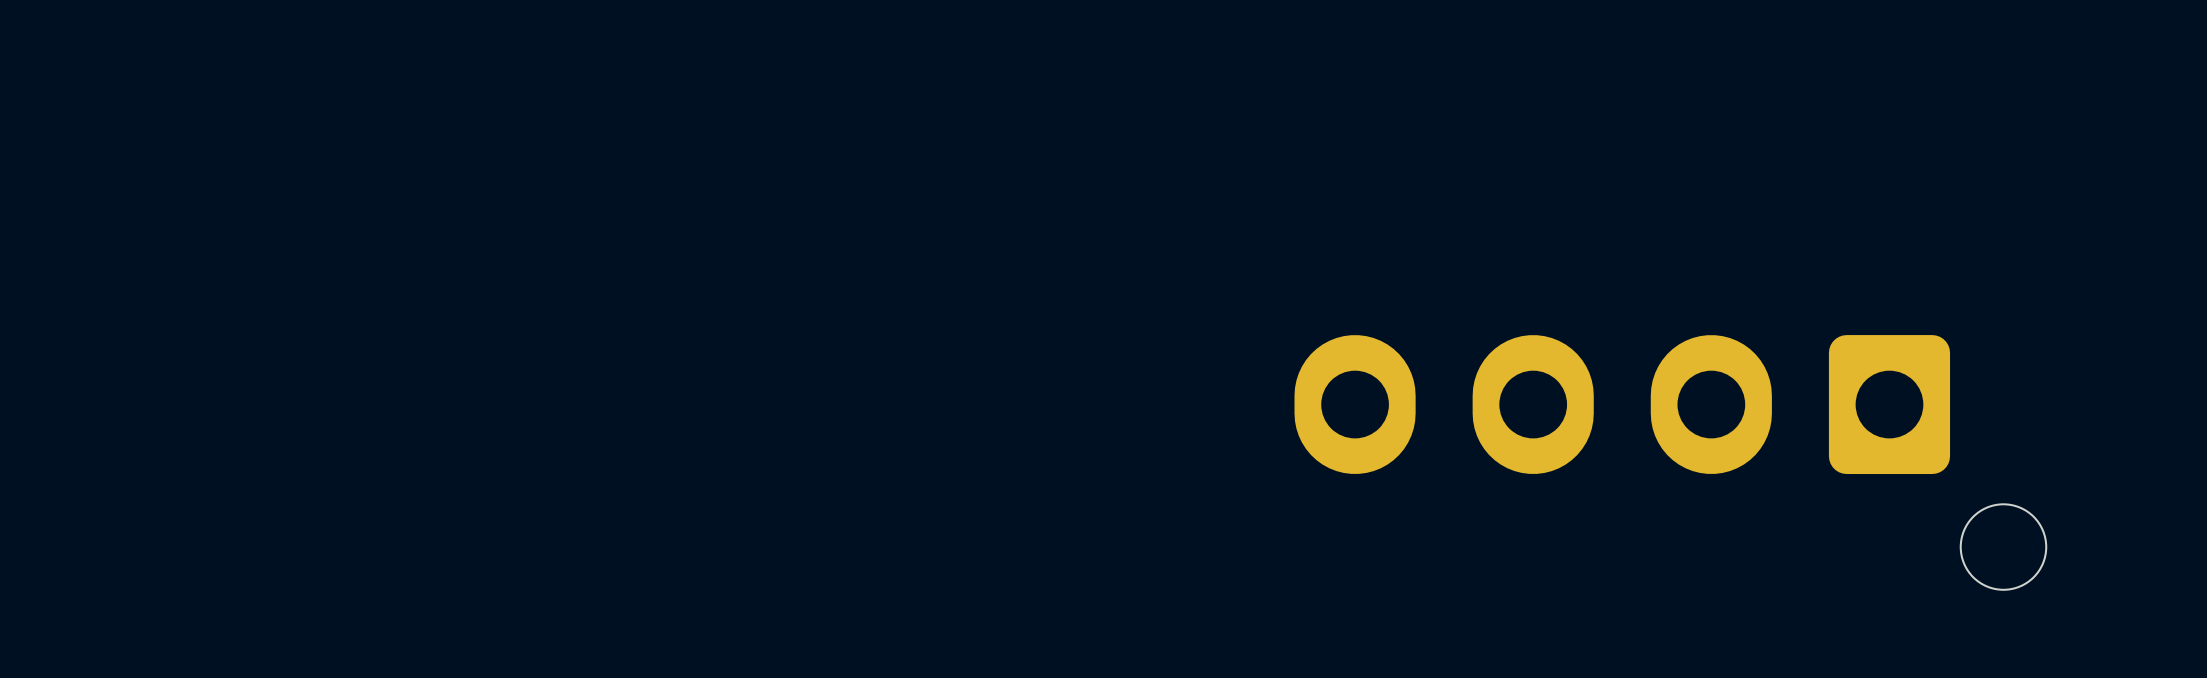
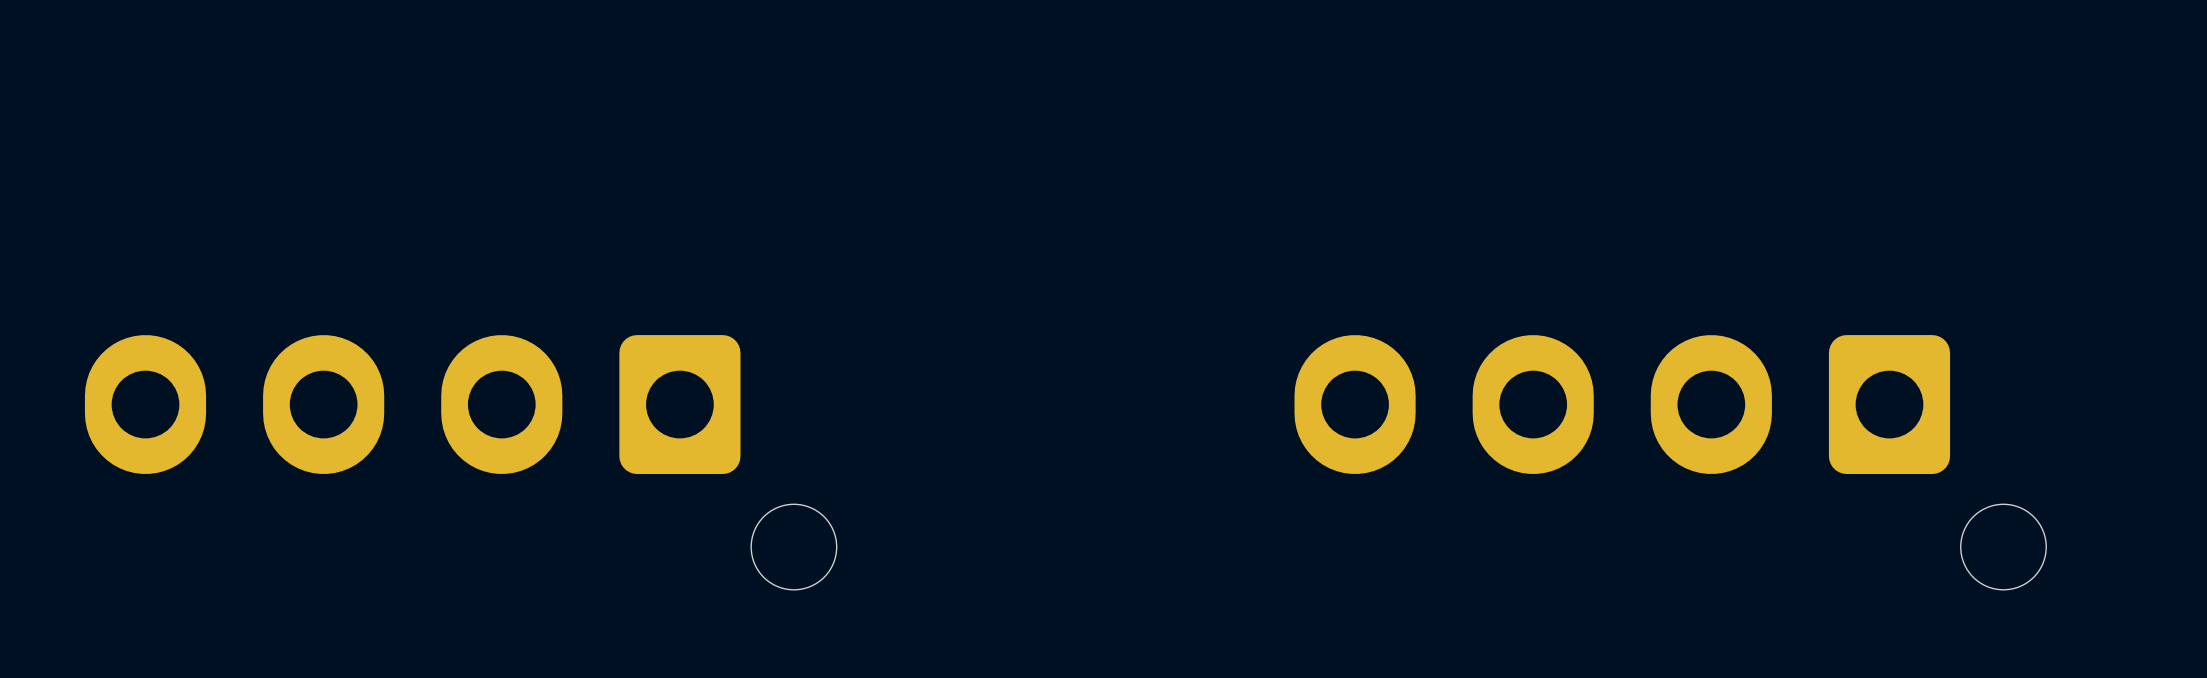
part: none -> (460, 462)

